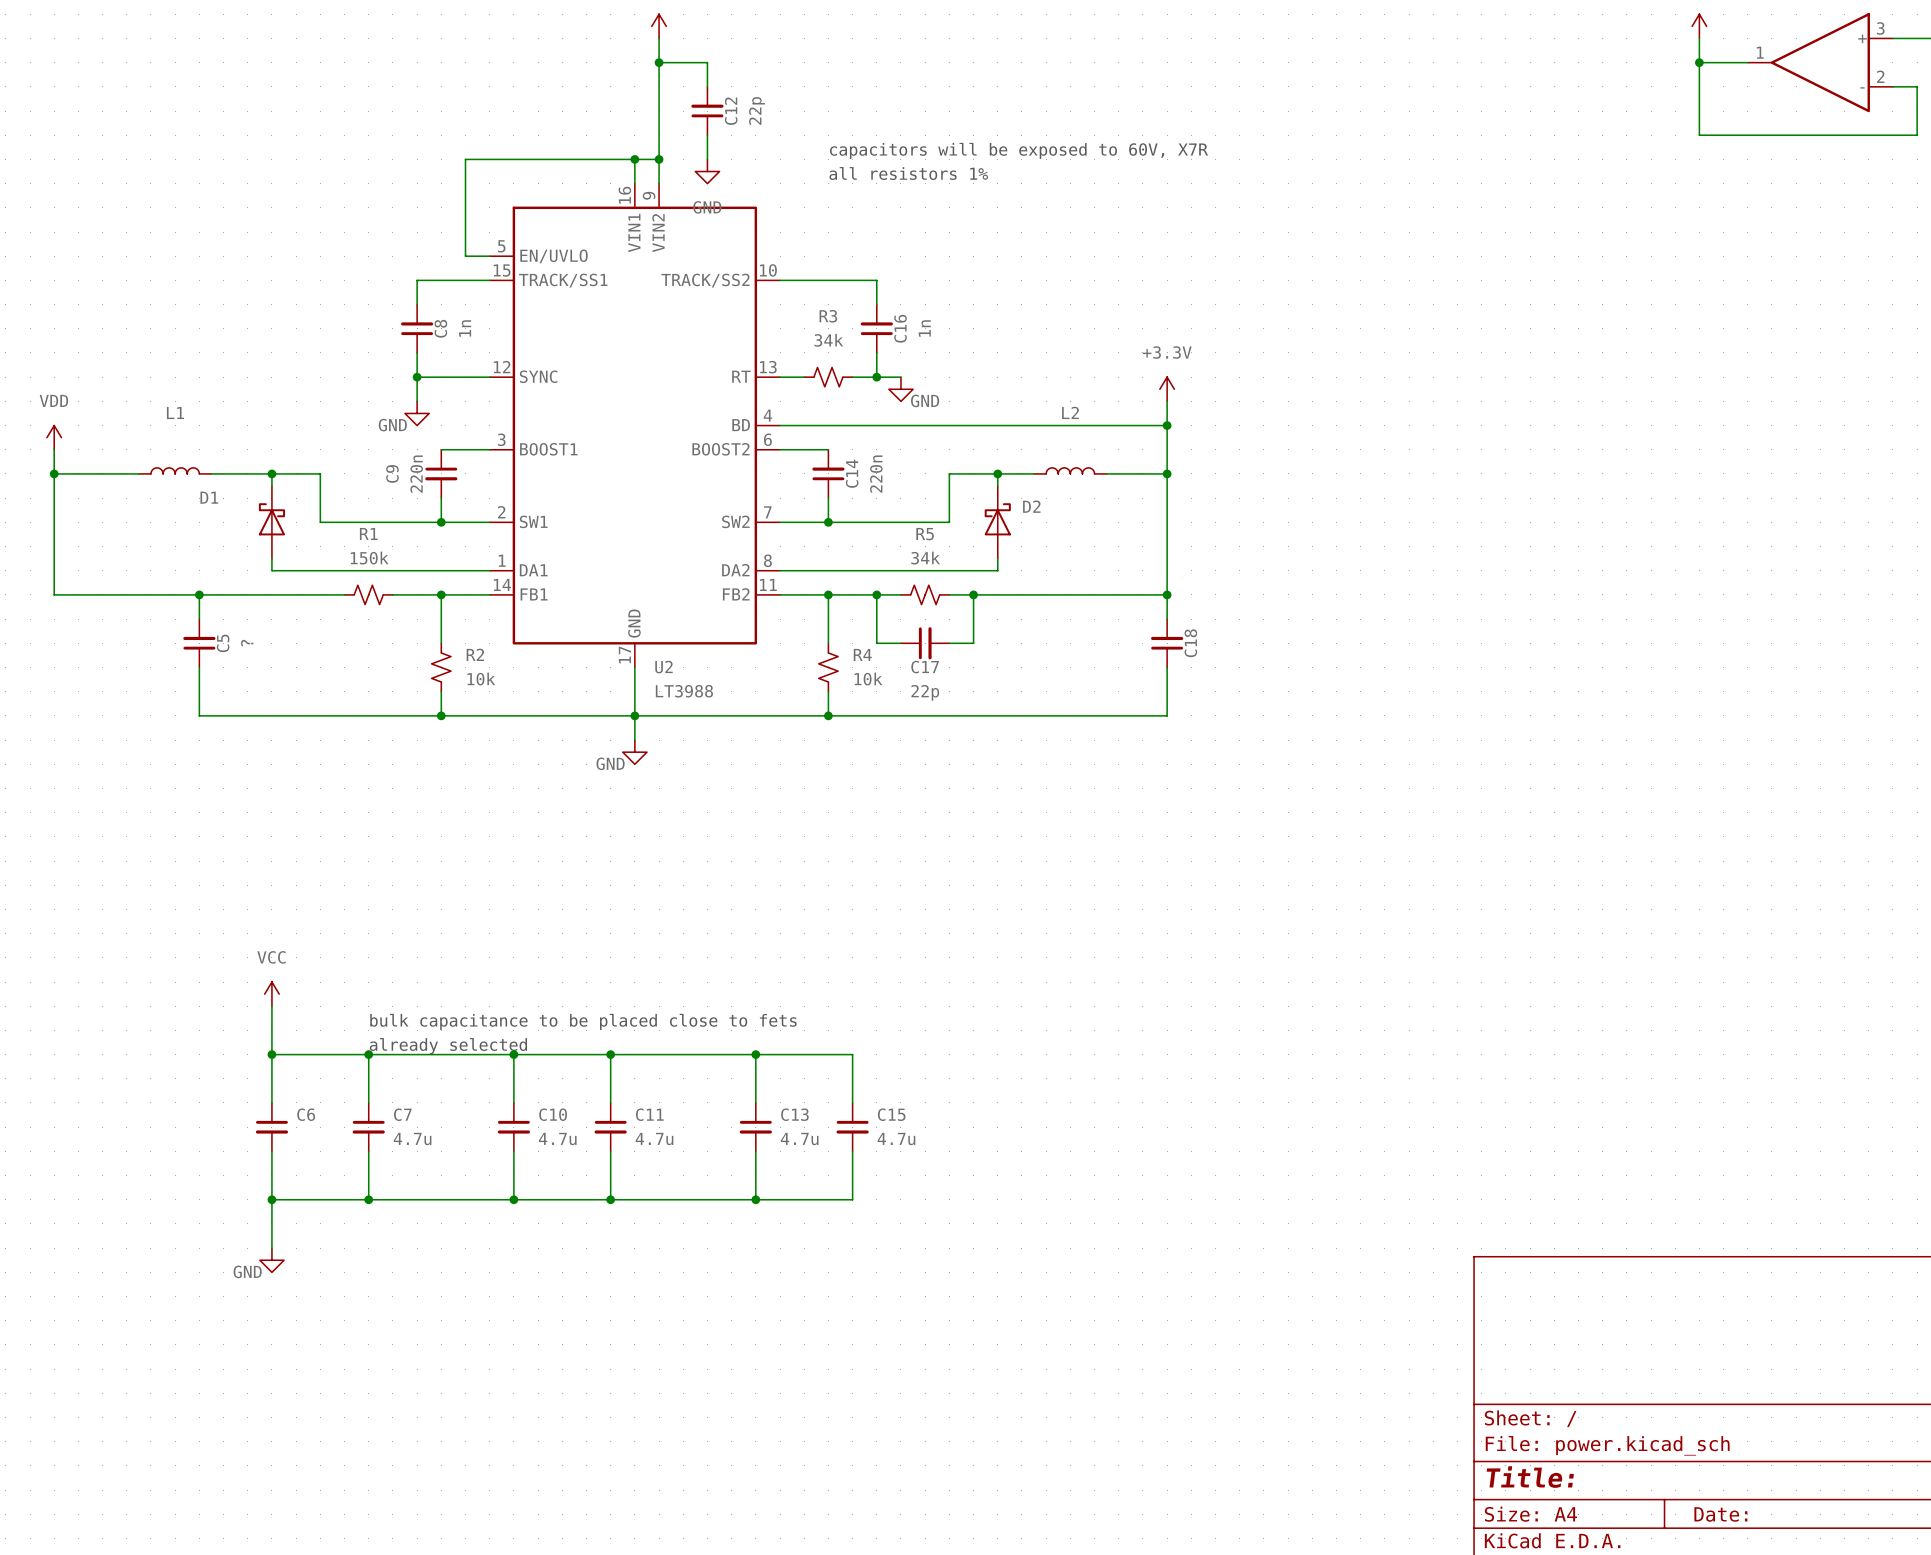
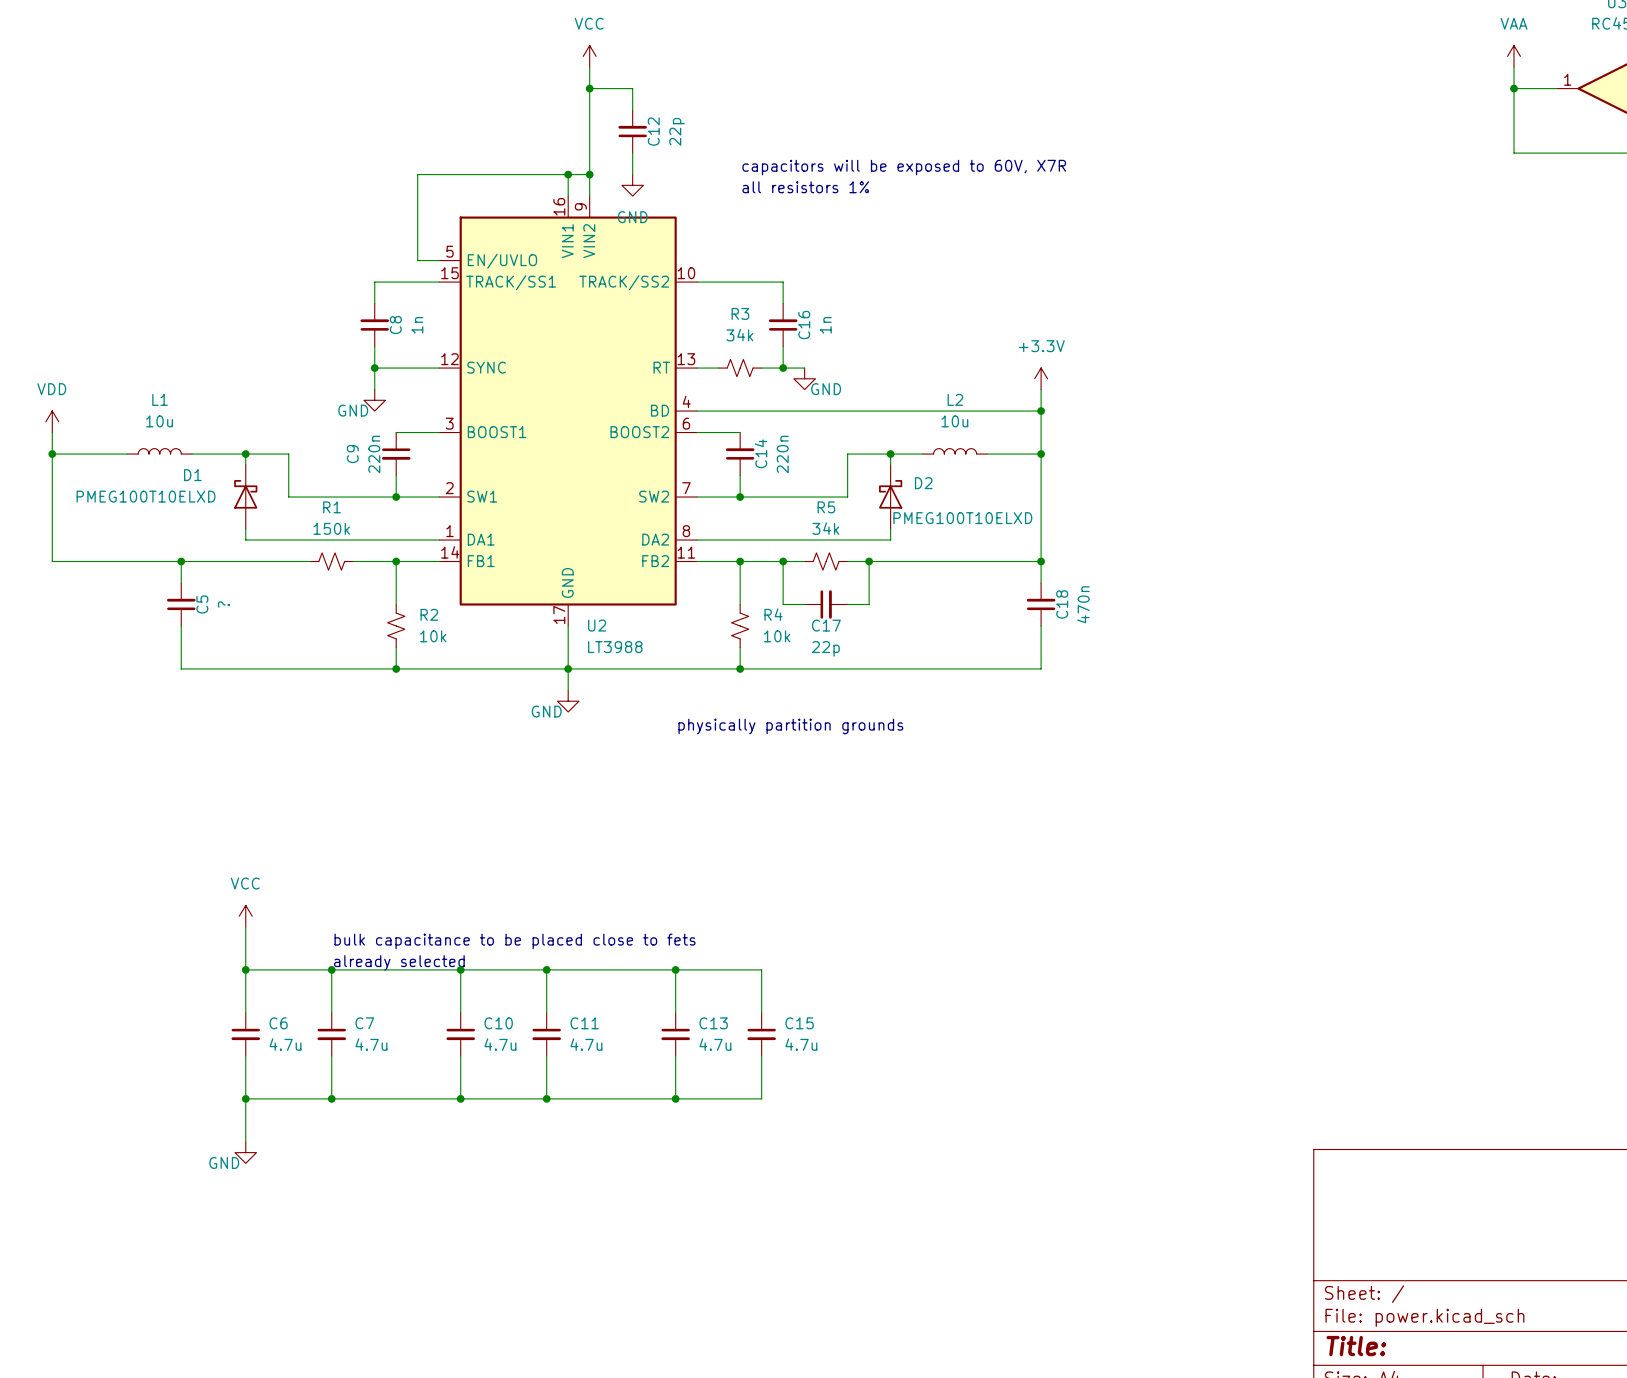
L1 value: none -> 10u (159, 421)
L2 value: none -> 10u (954, 421)
D1 value: none -> PMEG100T10ELXD (146, 496)
D2 value: none -> PMEG100T10ELXD (962, 518)
C18 value: none -> 470n (1083, 604)
text: none -> physically partition grounds (790, 726)
C6 value: none -> 4.7u (285, 1044)

